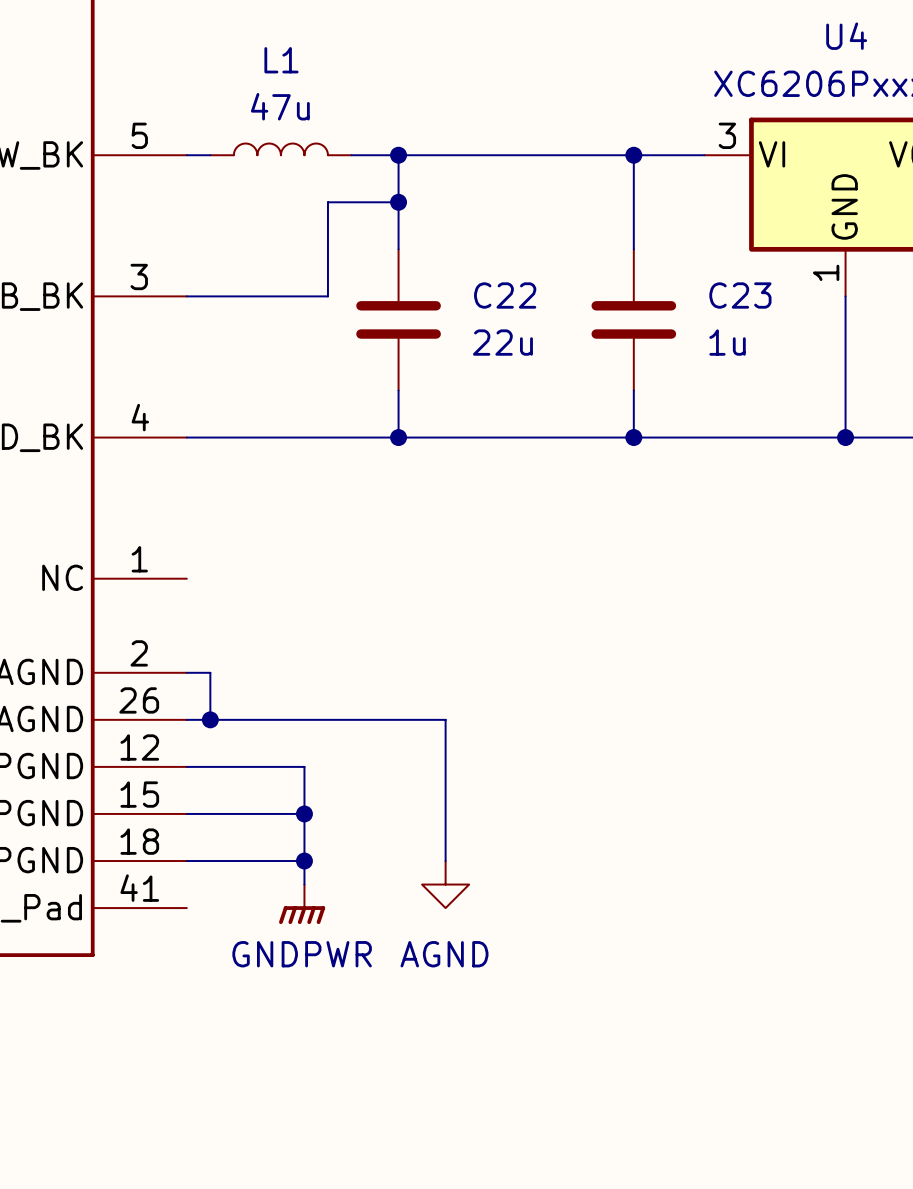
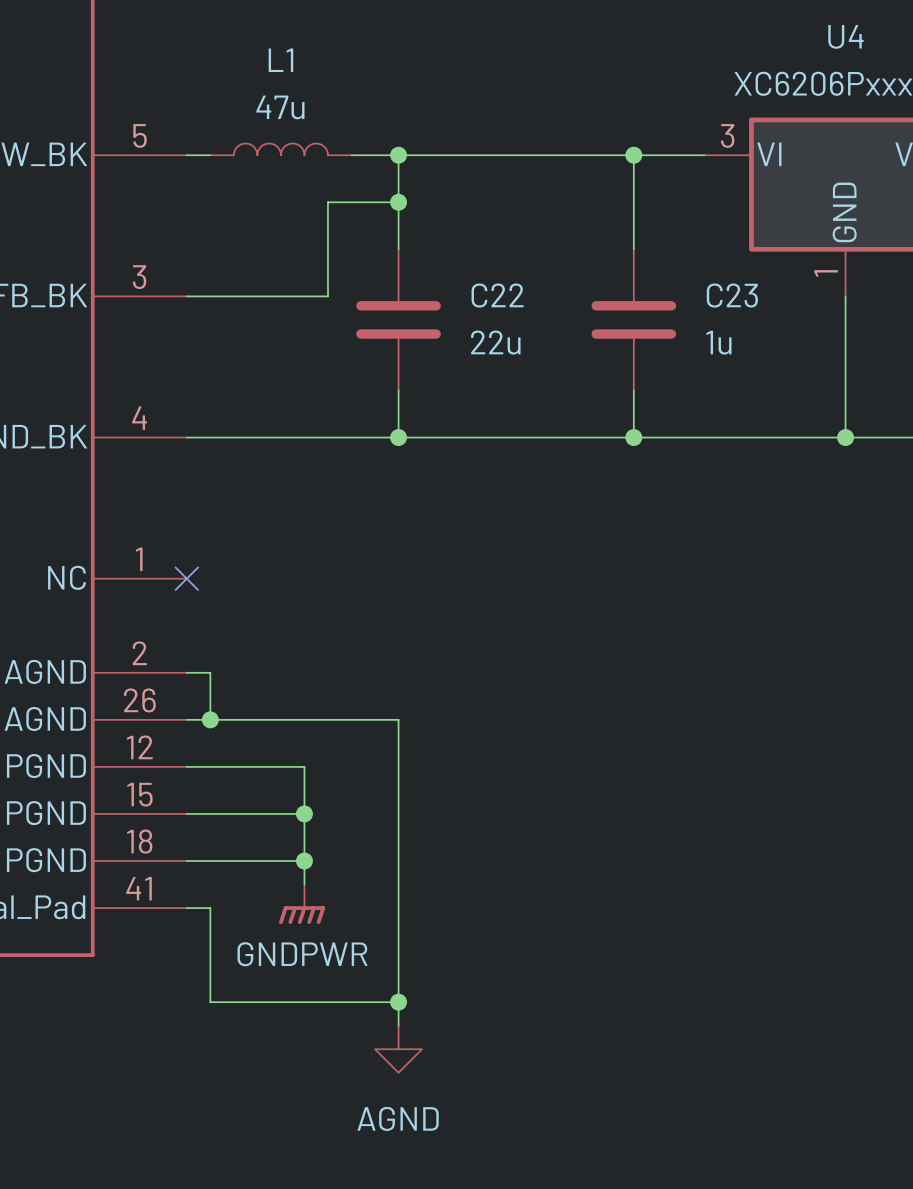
no-connect mark: none -> (186, 578)
wire: (398, 719) (445, 719) (445, 861) -> (398, 719) (398, 1025)
power symbol position: AGND (445, 884) -> AGND (398, 1049)
wire: none -> (186, 908) (210, 908) (210, 1002) (398, 1002)
junction: none -> (398, 1002)

